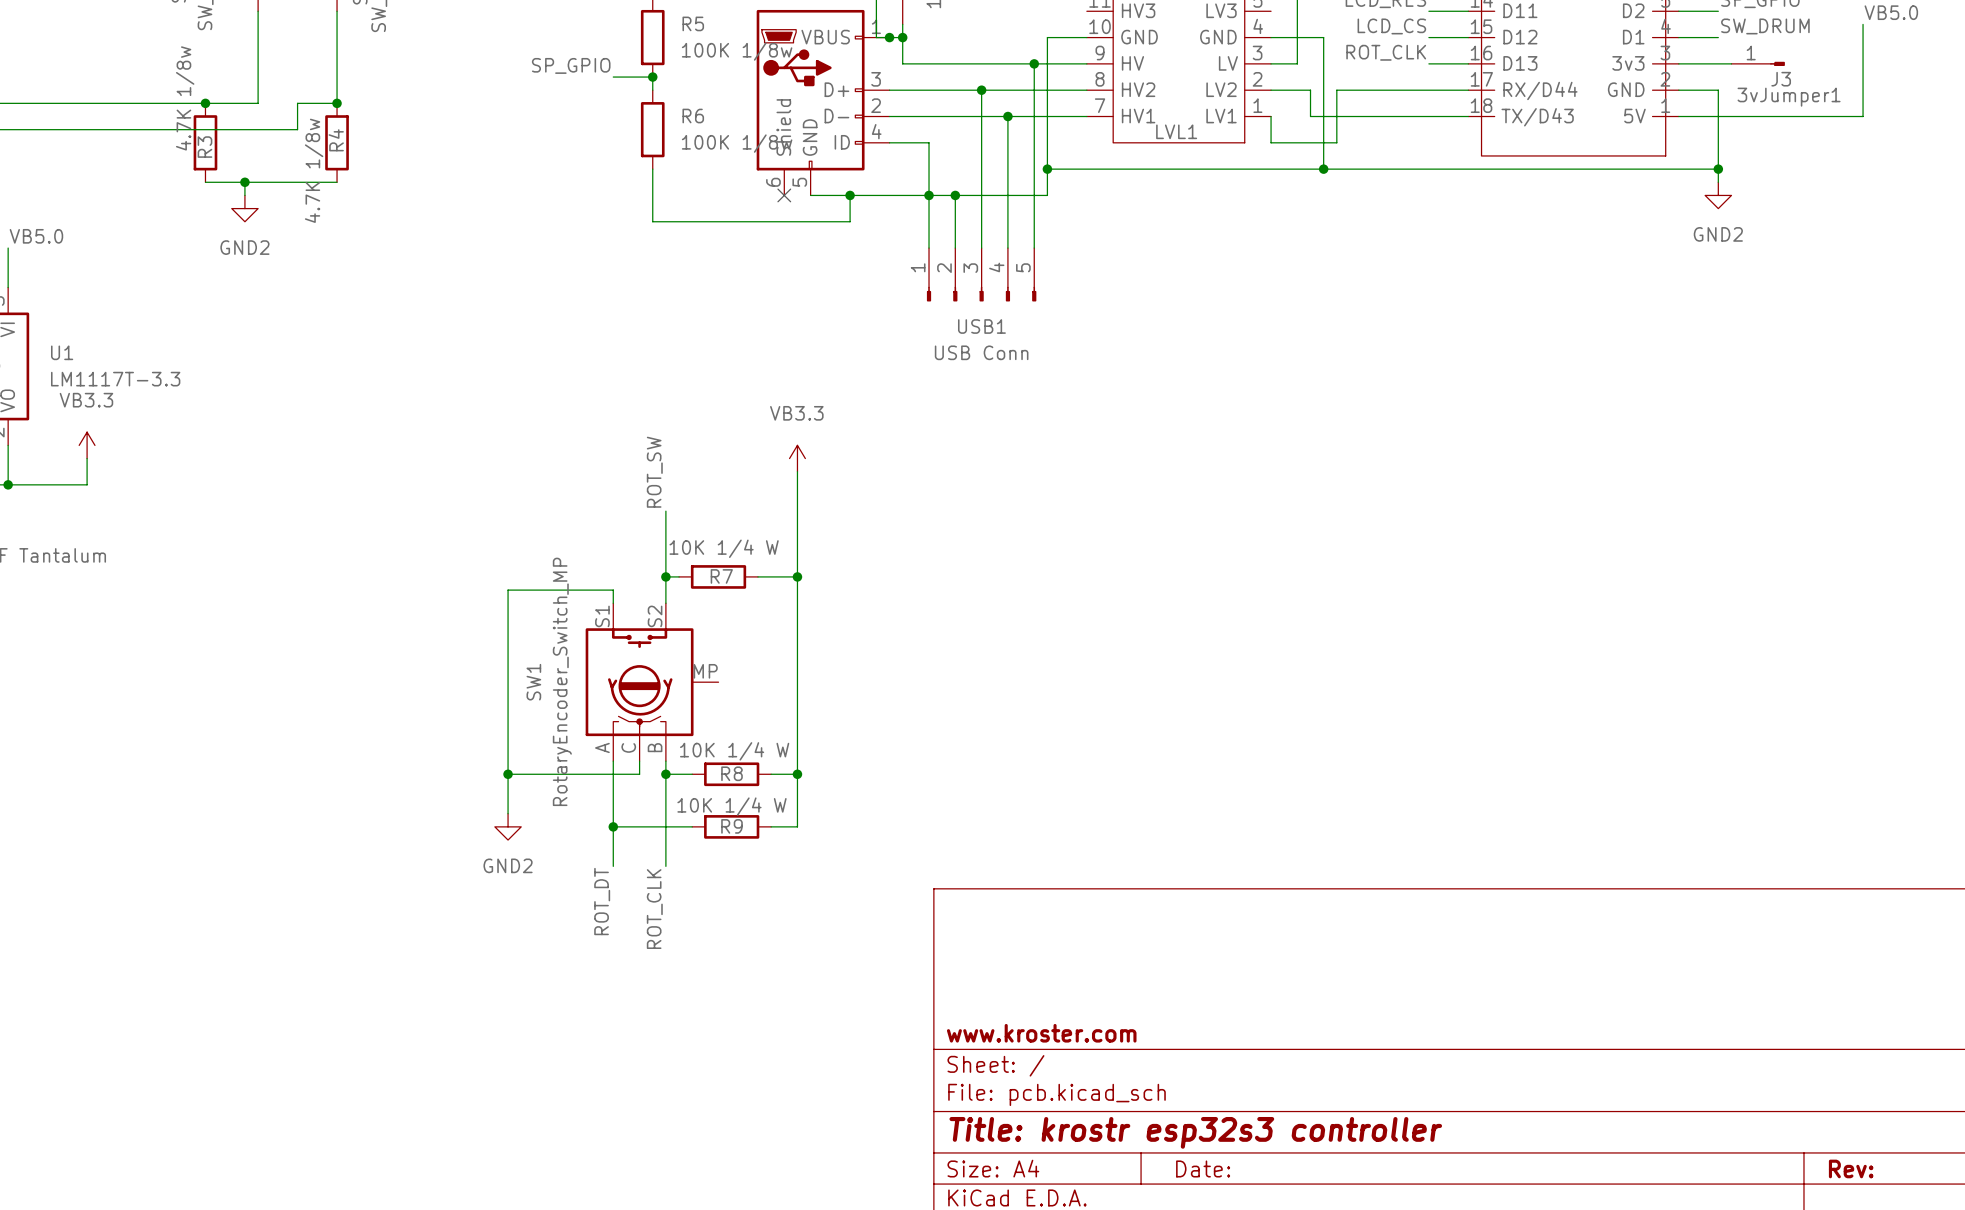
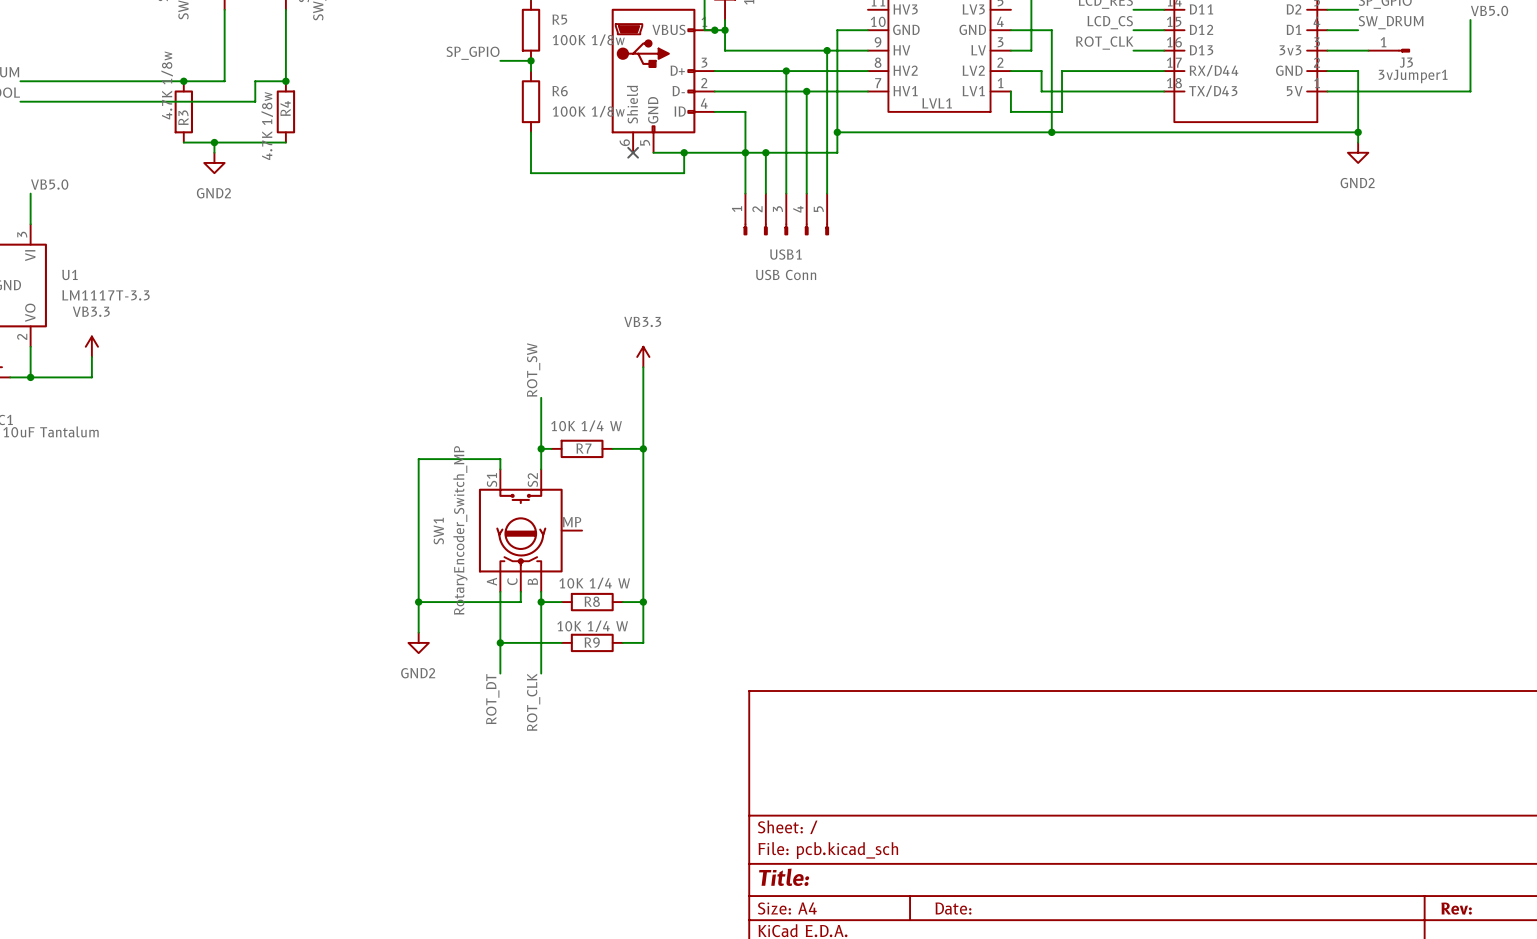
title block: www.kroster.com (1041, 1033) -> none
title block: Title: krostr esp32s3 controller (1195, 1132) -> Title: (784, 877)

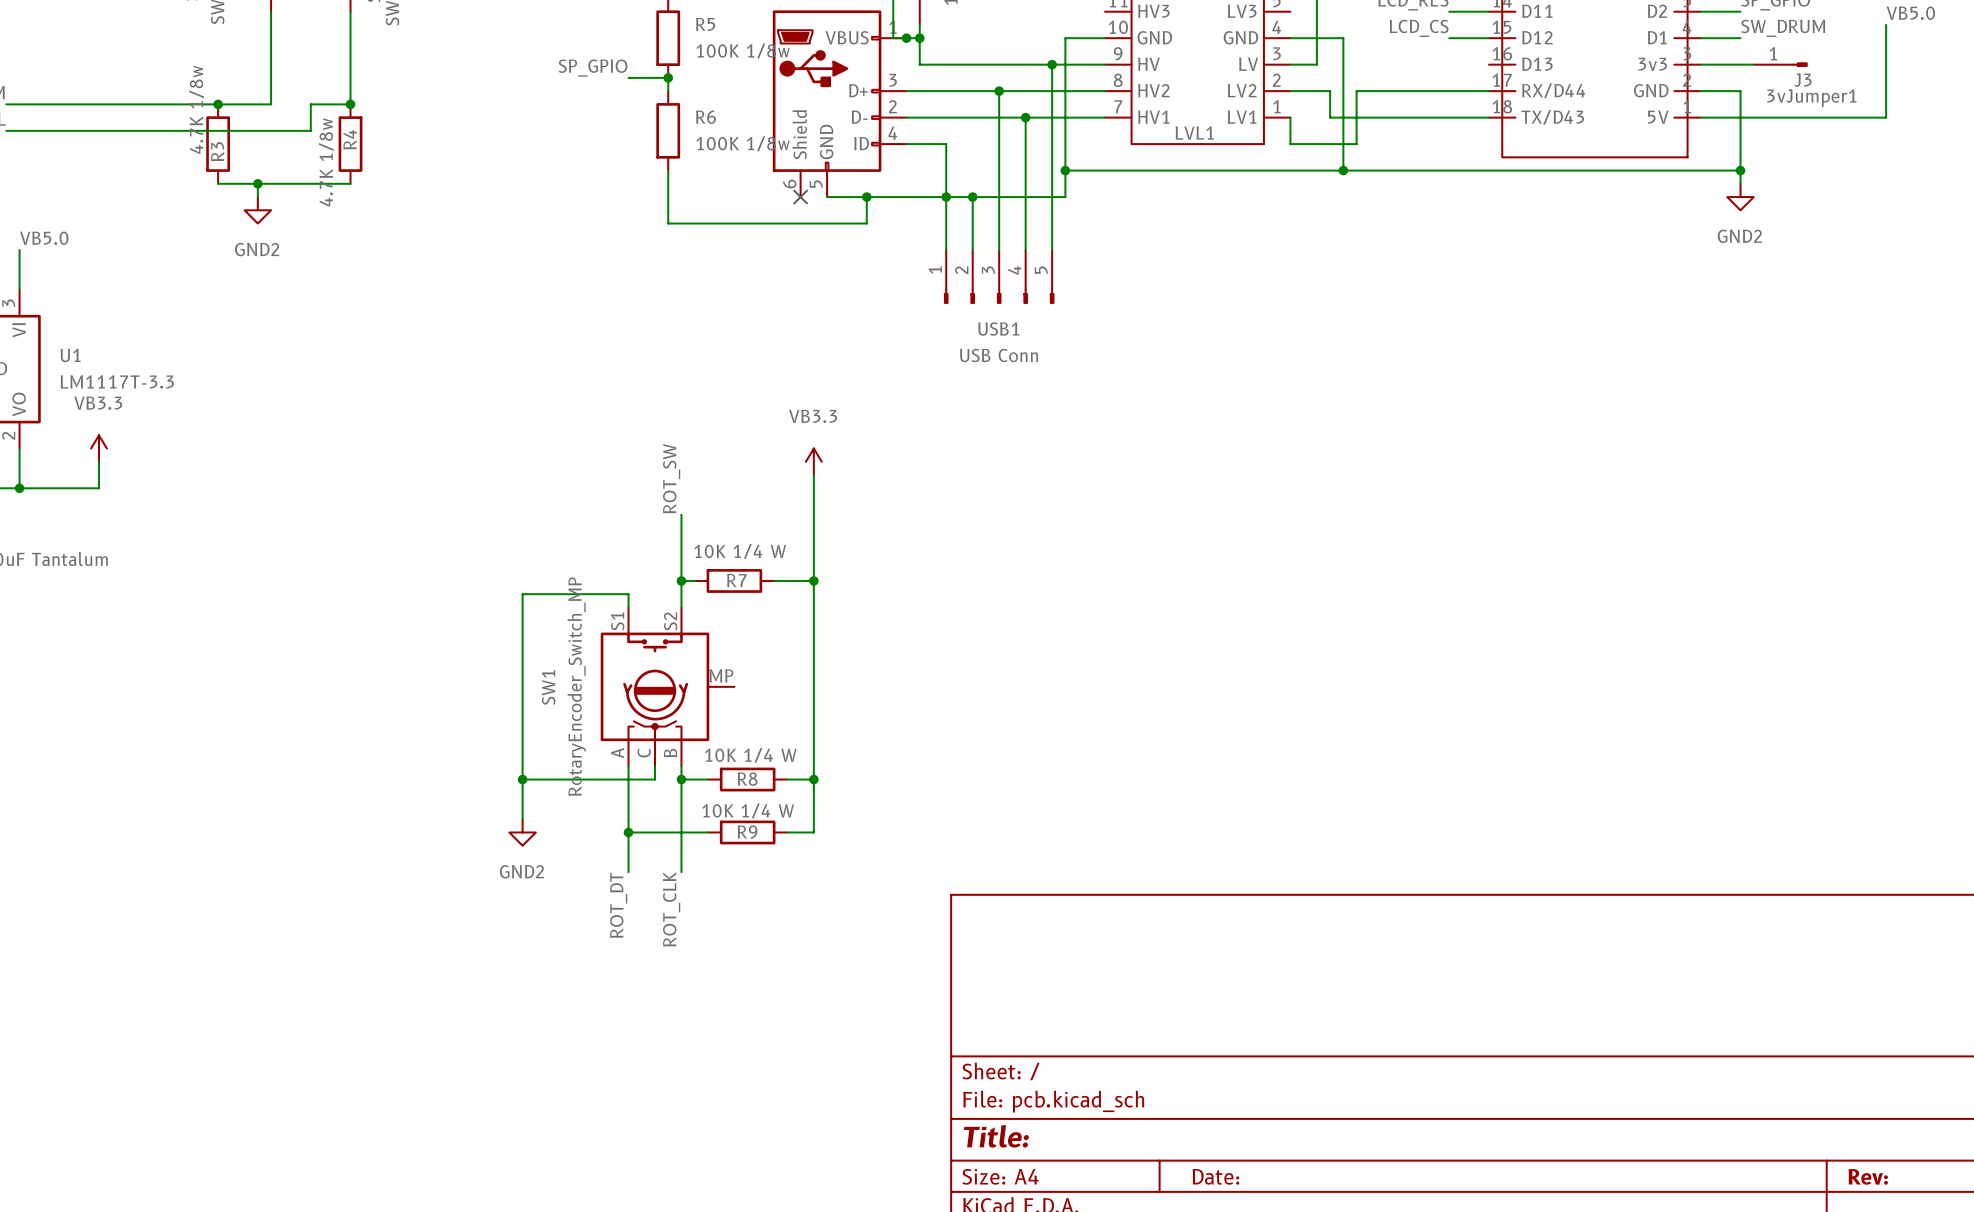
label: ROT_CLK (1104, 43) -> none
wire: (1133, 50) (1164, 50) -> none

